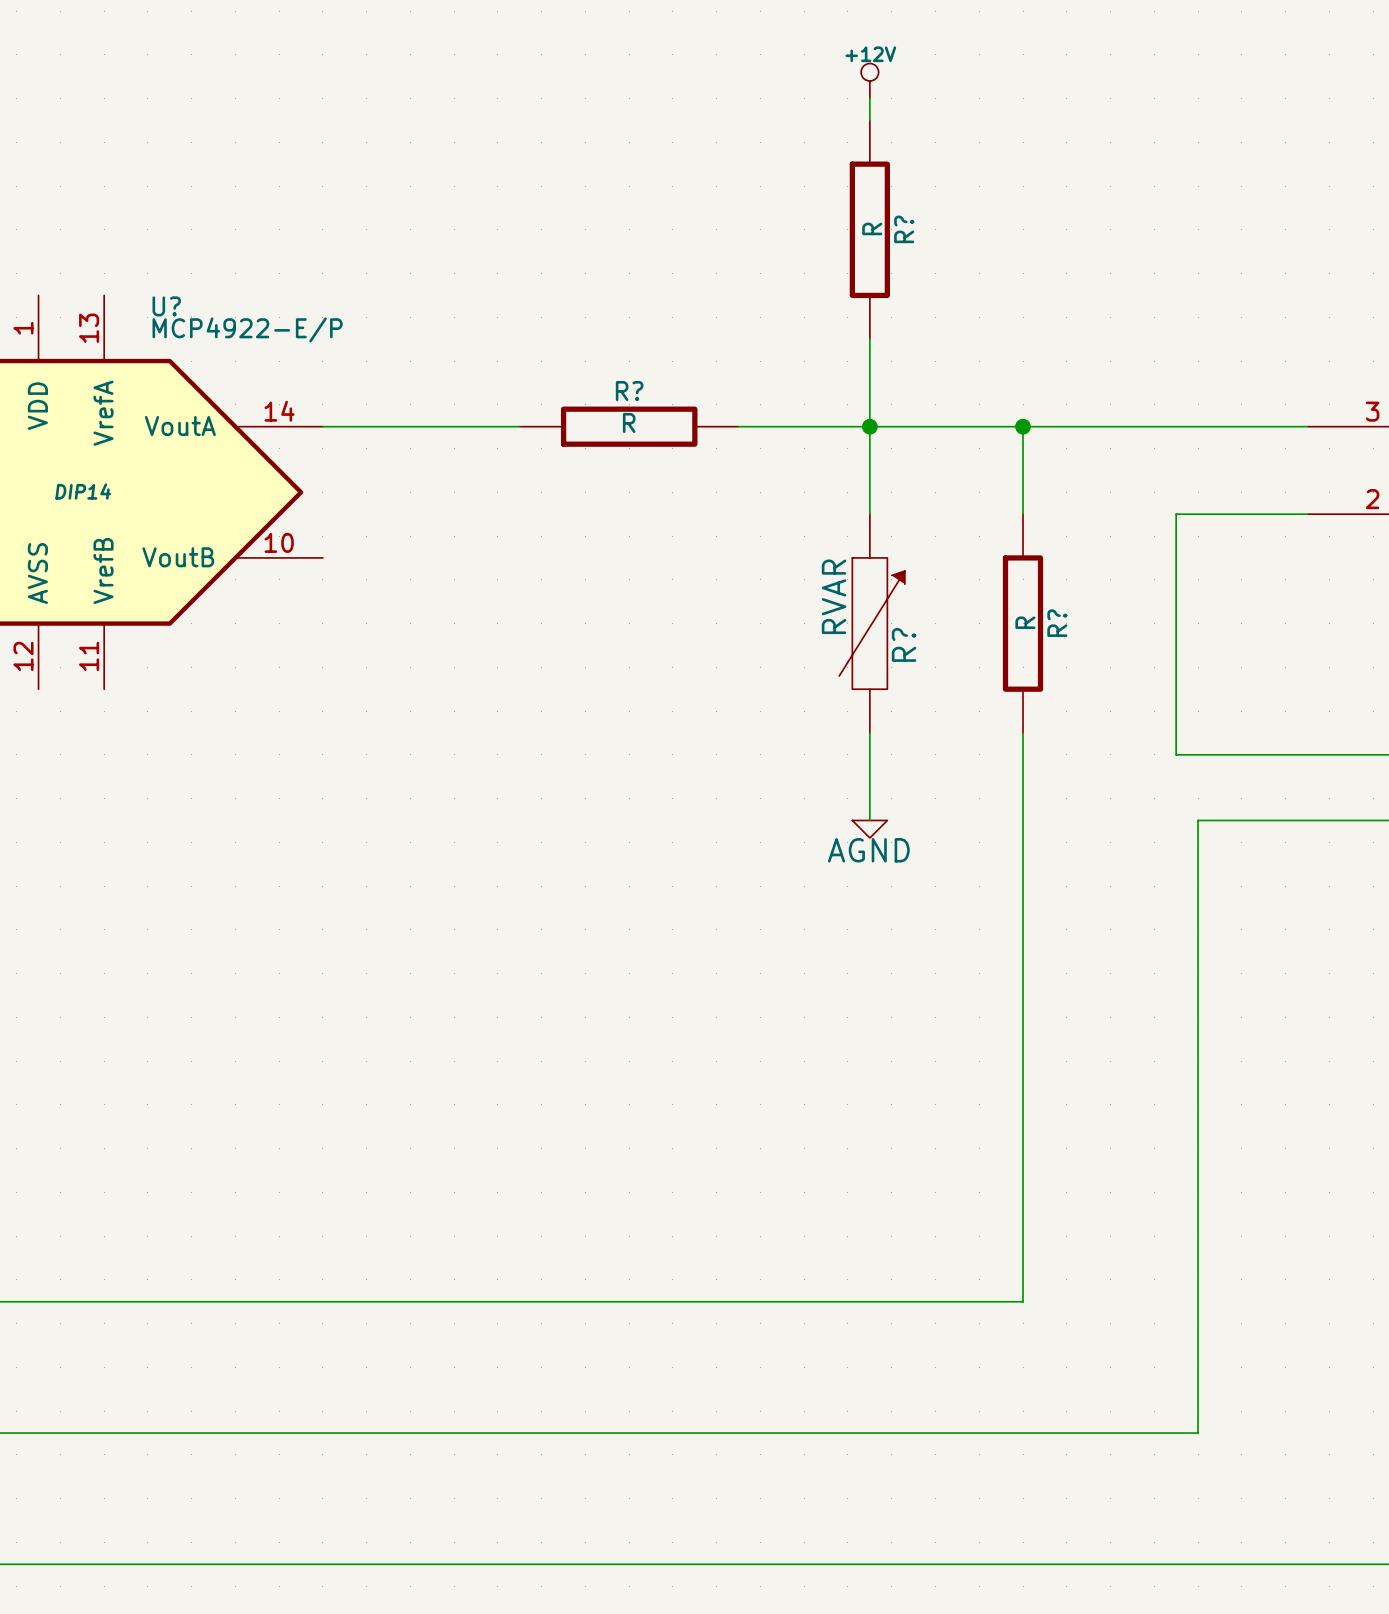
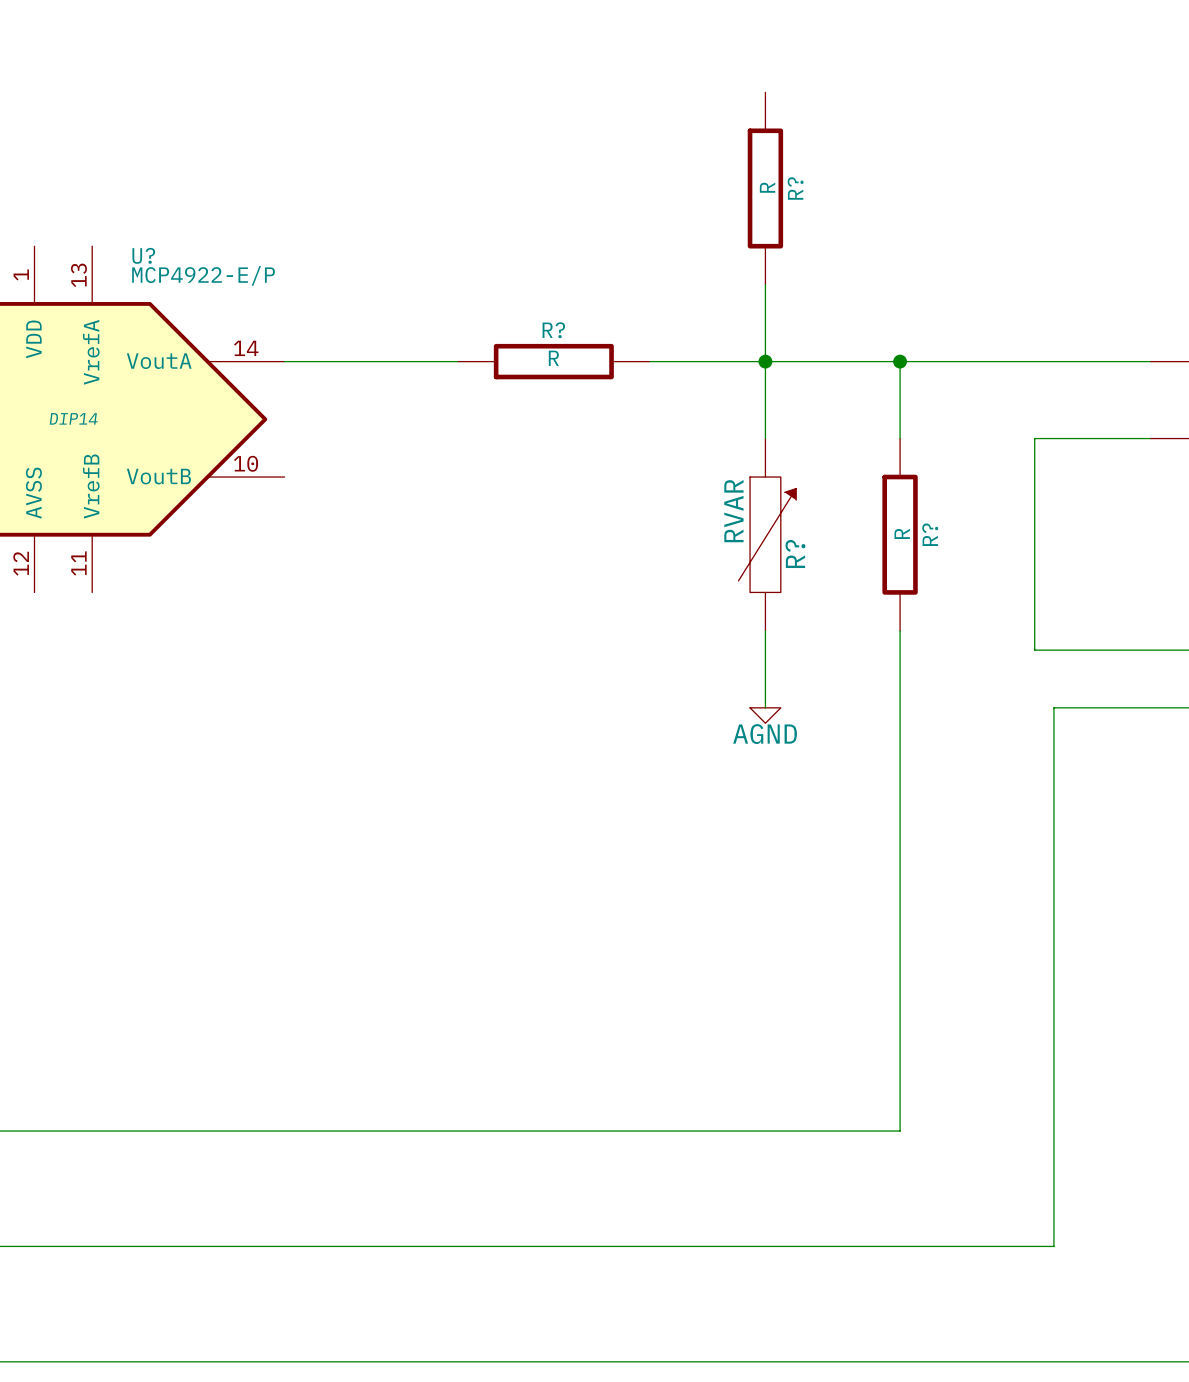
power symbol: +12V (869, 81) -> none
wire: (869, 98) (869, 120) -> none

